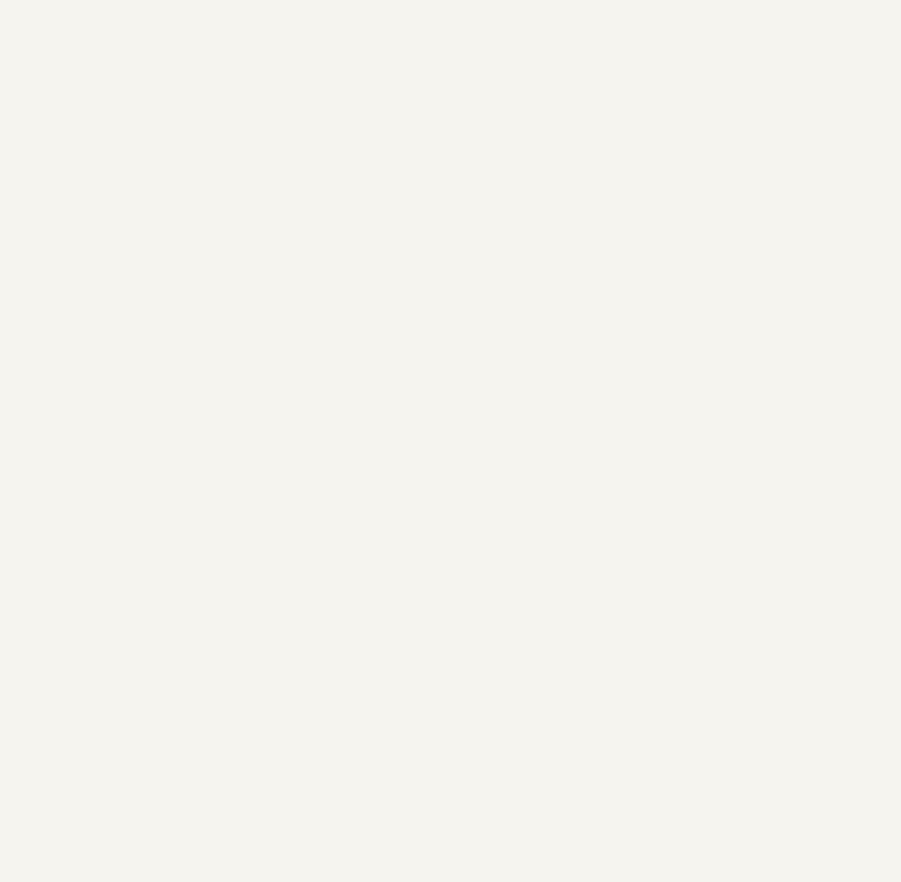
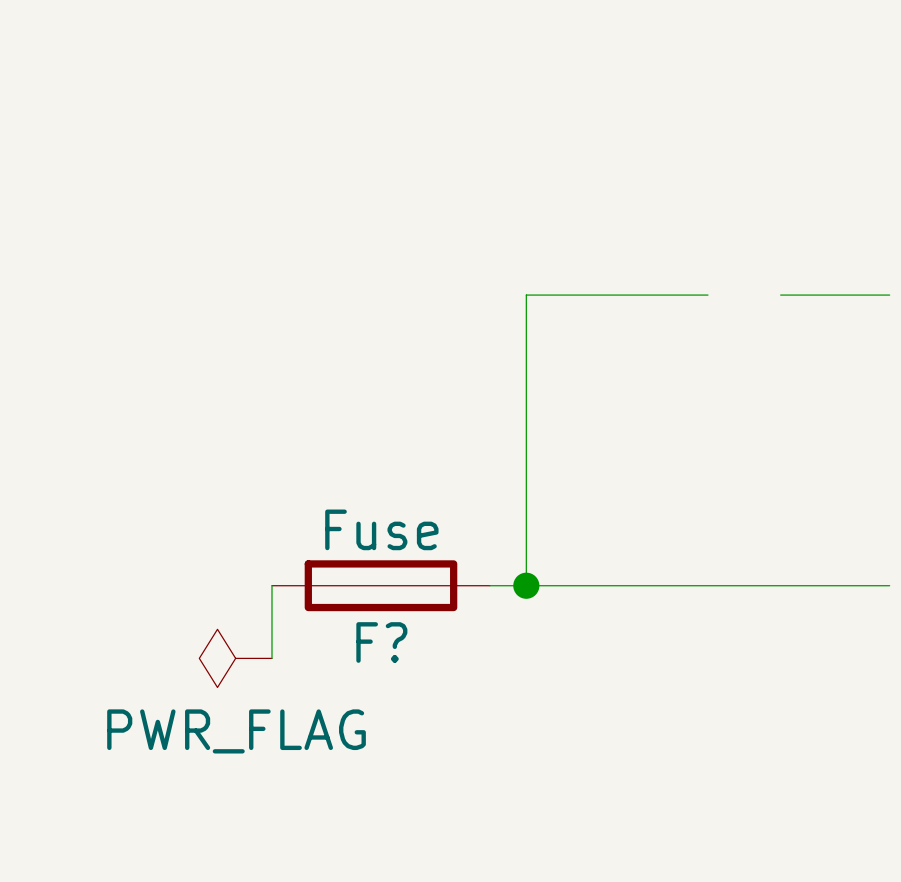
wire: none -> (707, 295) (526, 295) (526, 585)
wire: none -> (780, 295) (889, 295)
wire: none -> (271, 585) (271, 658)
F?: none -> Fuse (380, 585)
wire: none -> (489, 585) (889, 585)
junction: none -> (526, 585)
power symbol: none -> PWR_FLAG (235, 658)

